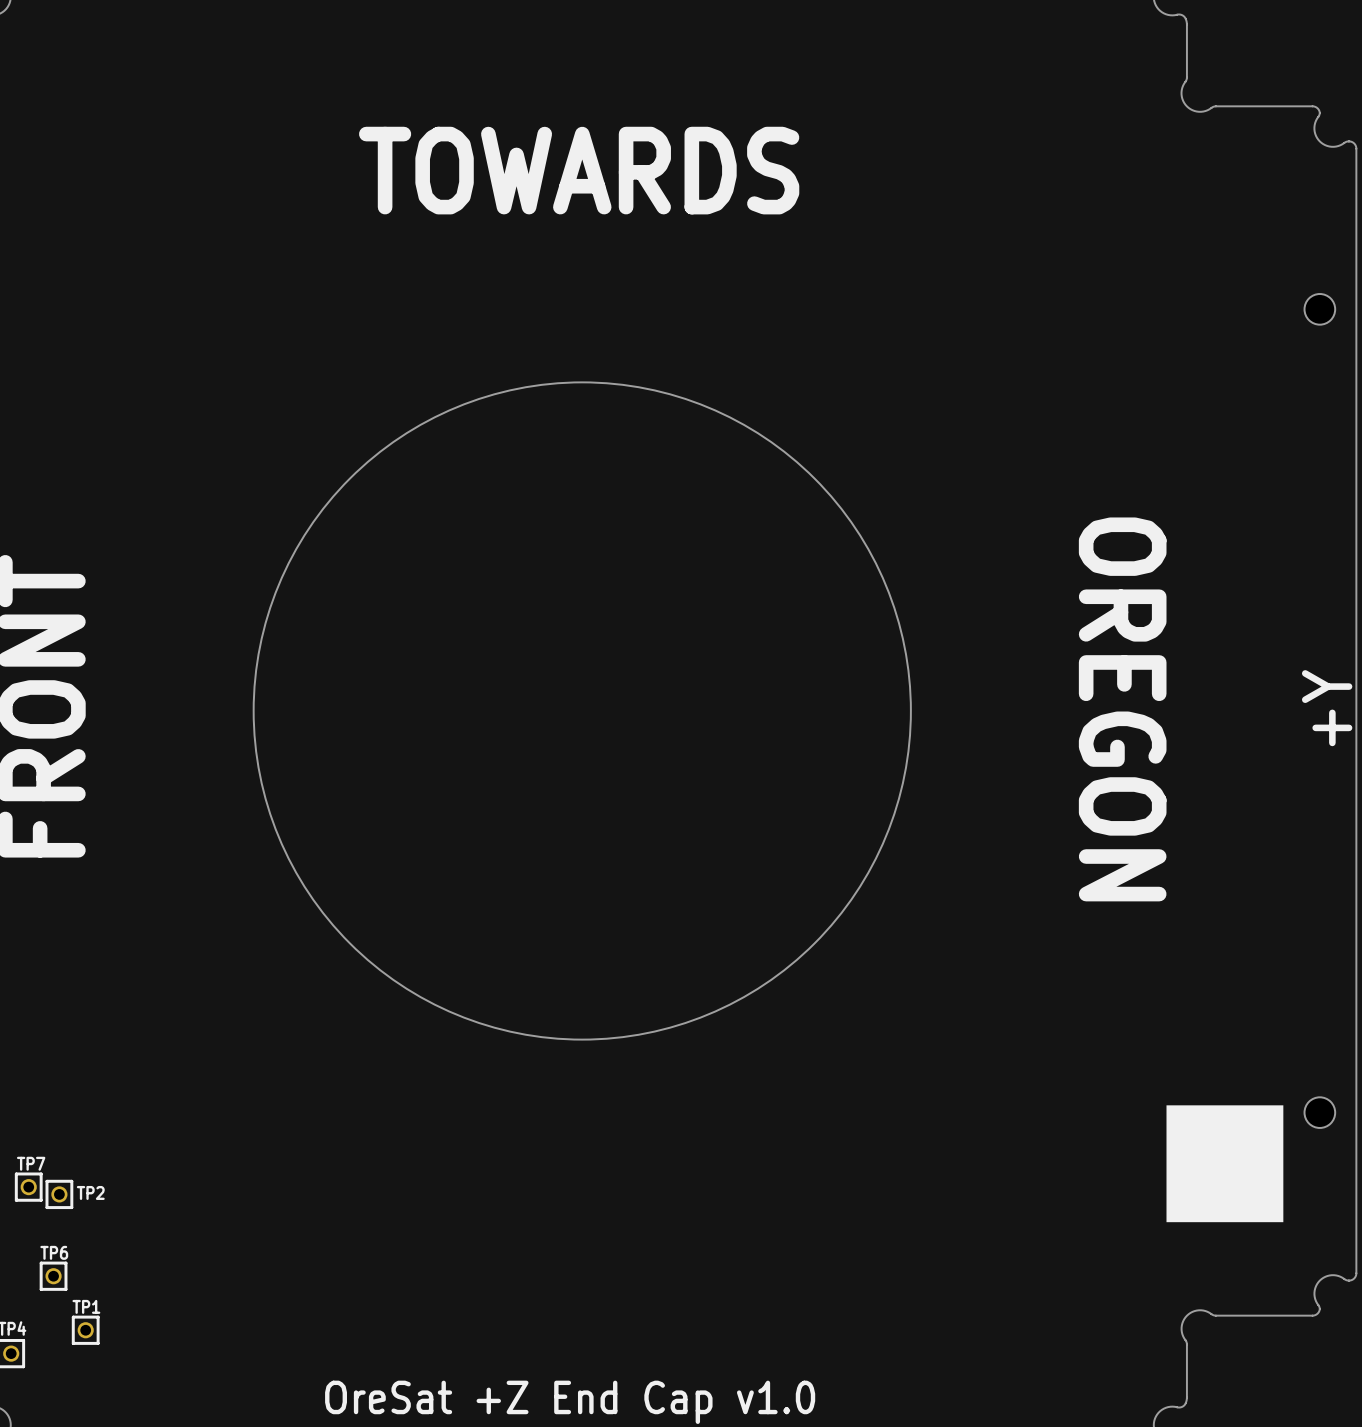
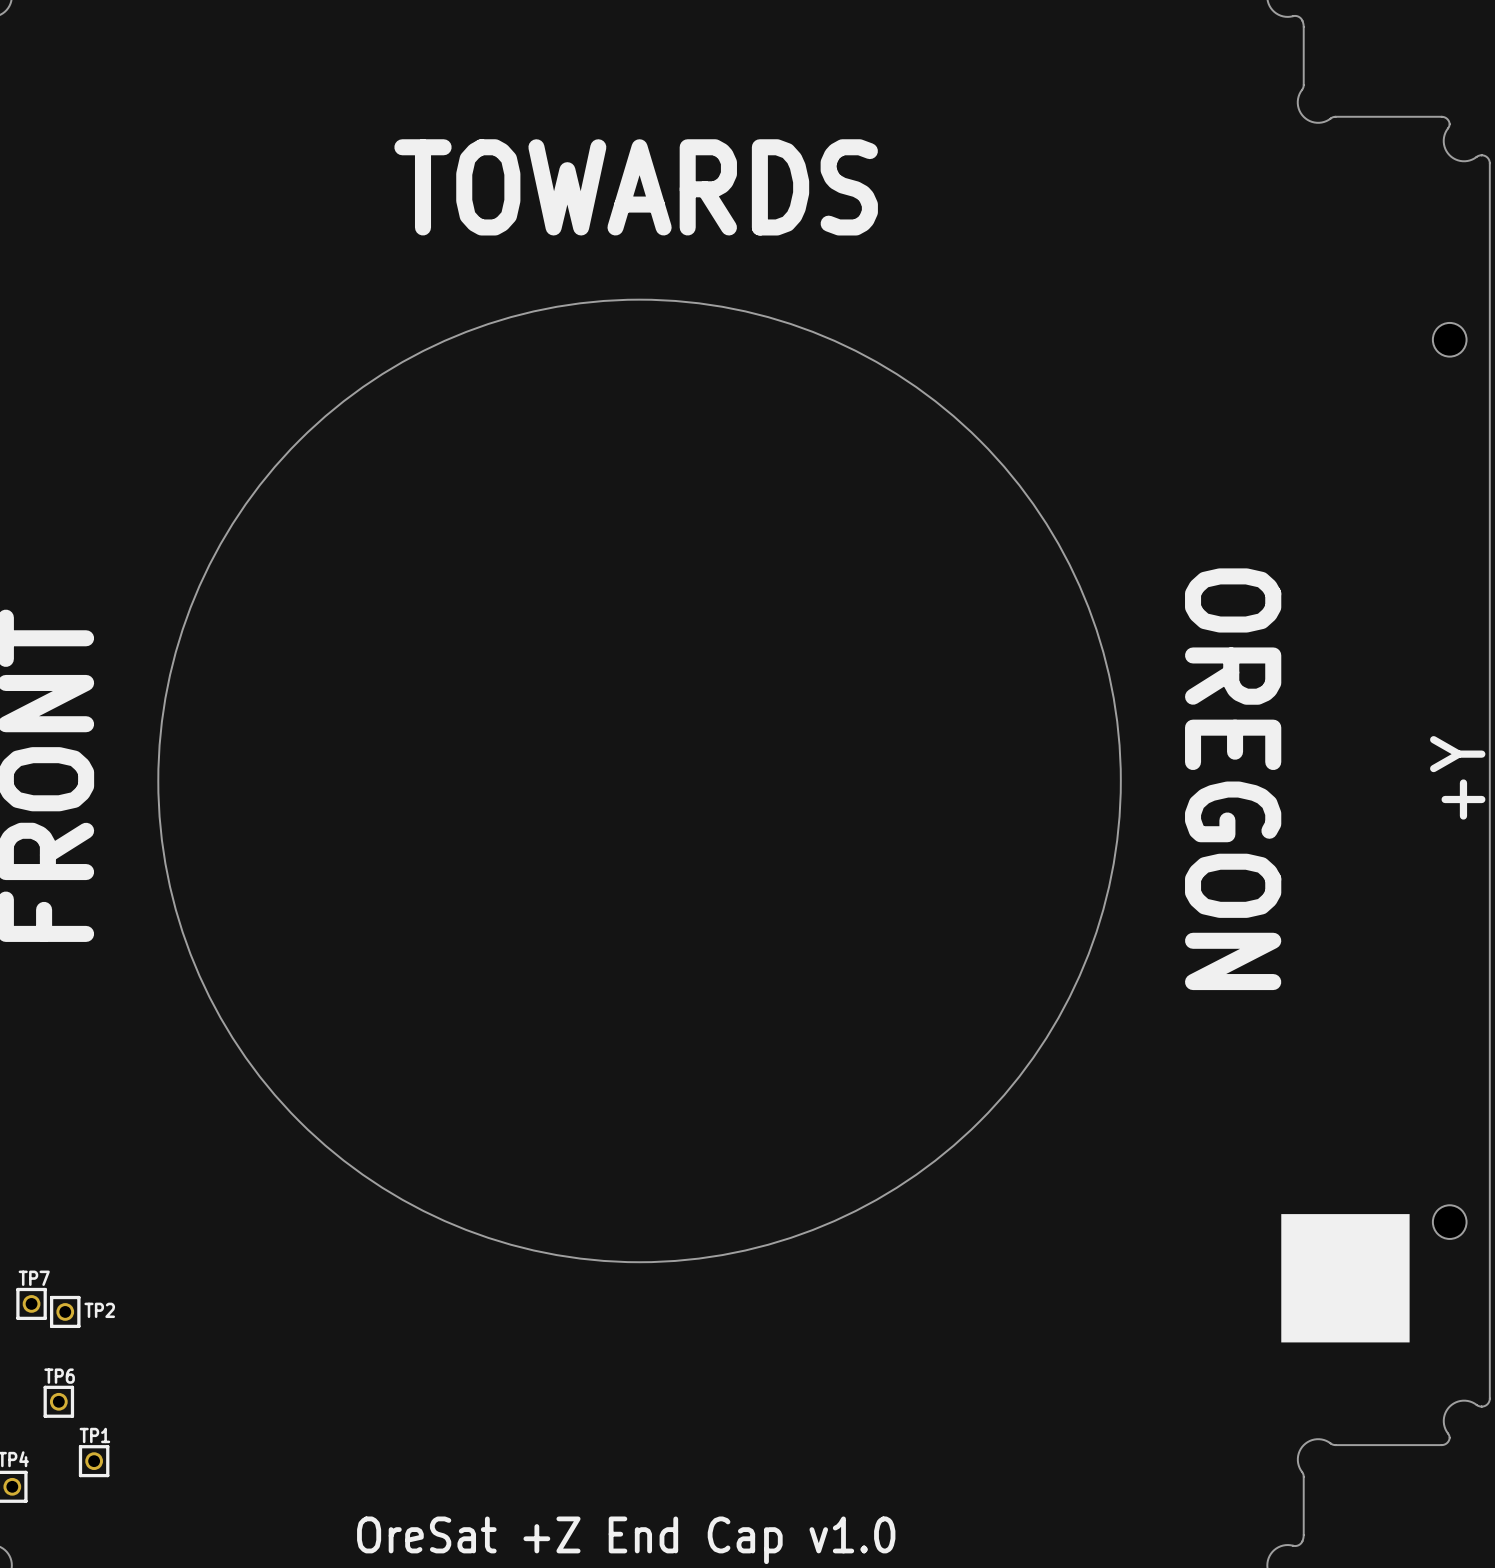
round board edge size: [253, 382, 911, 1040] -> [158, 299, 1121, 1263]

